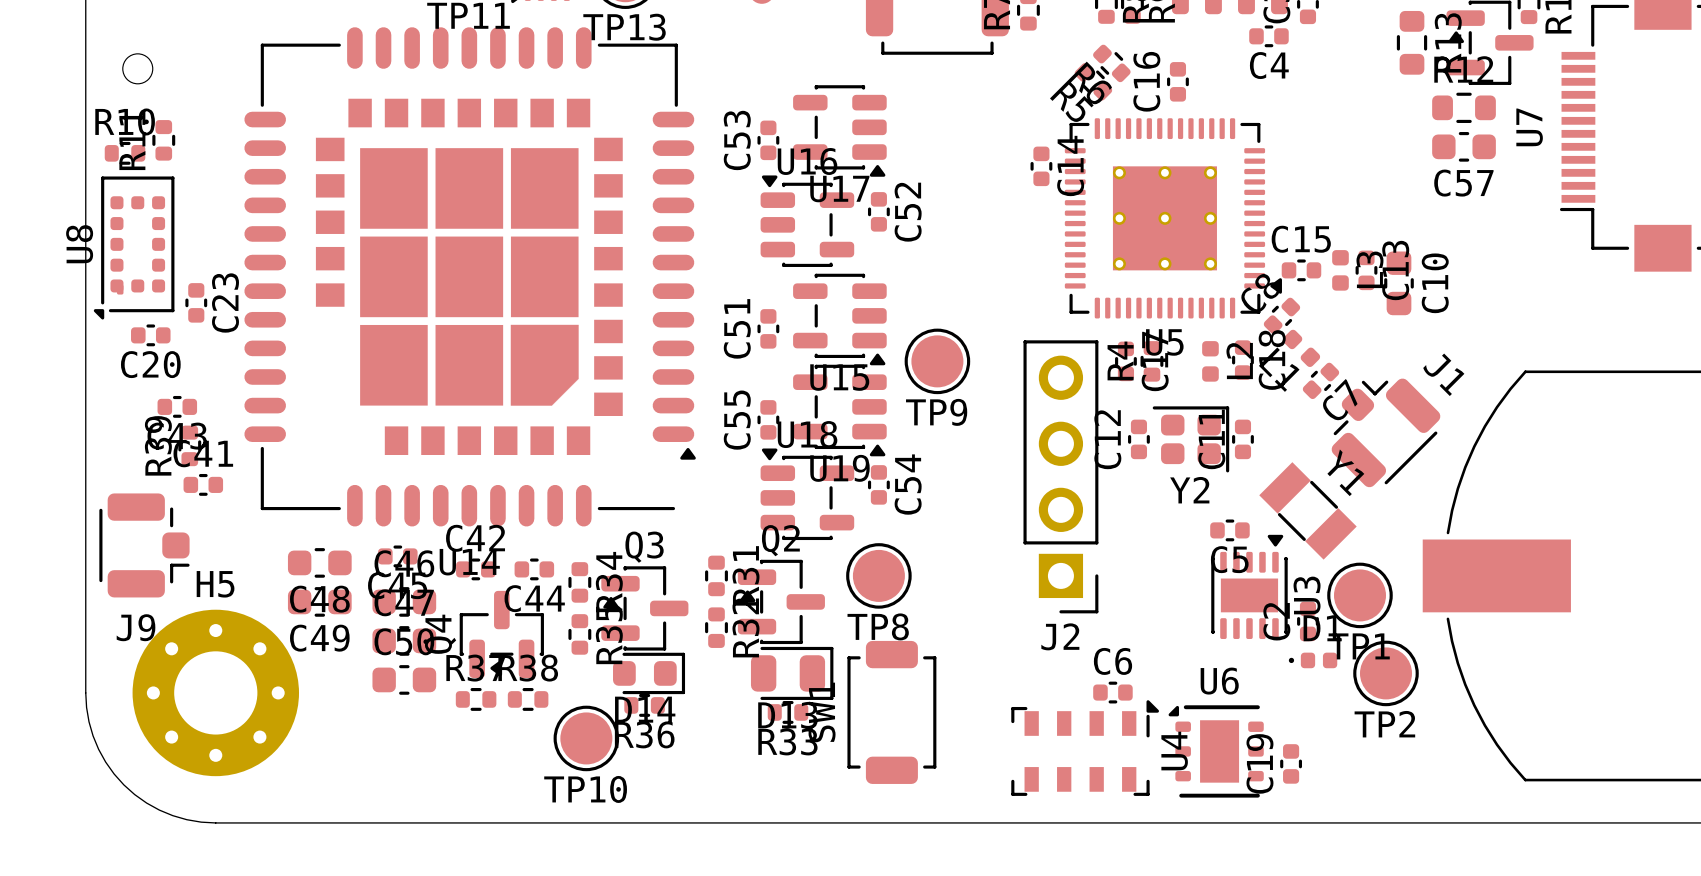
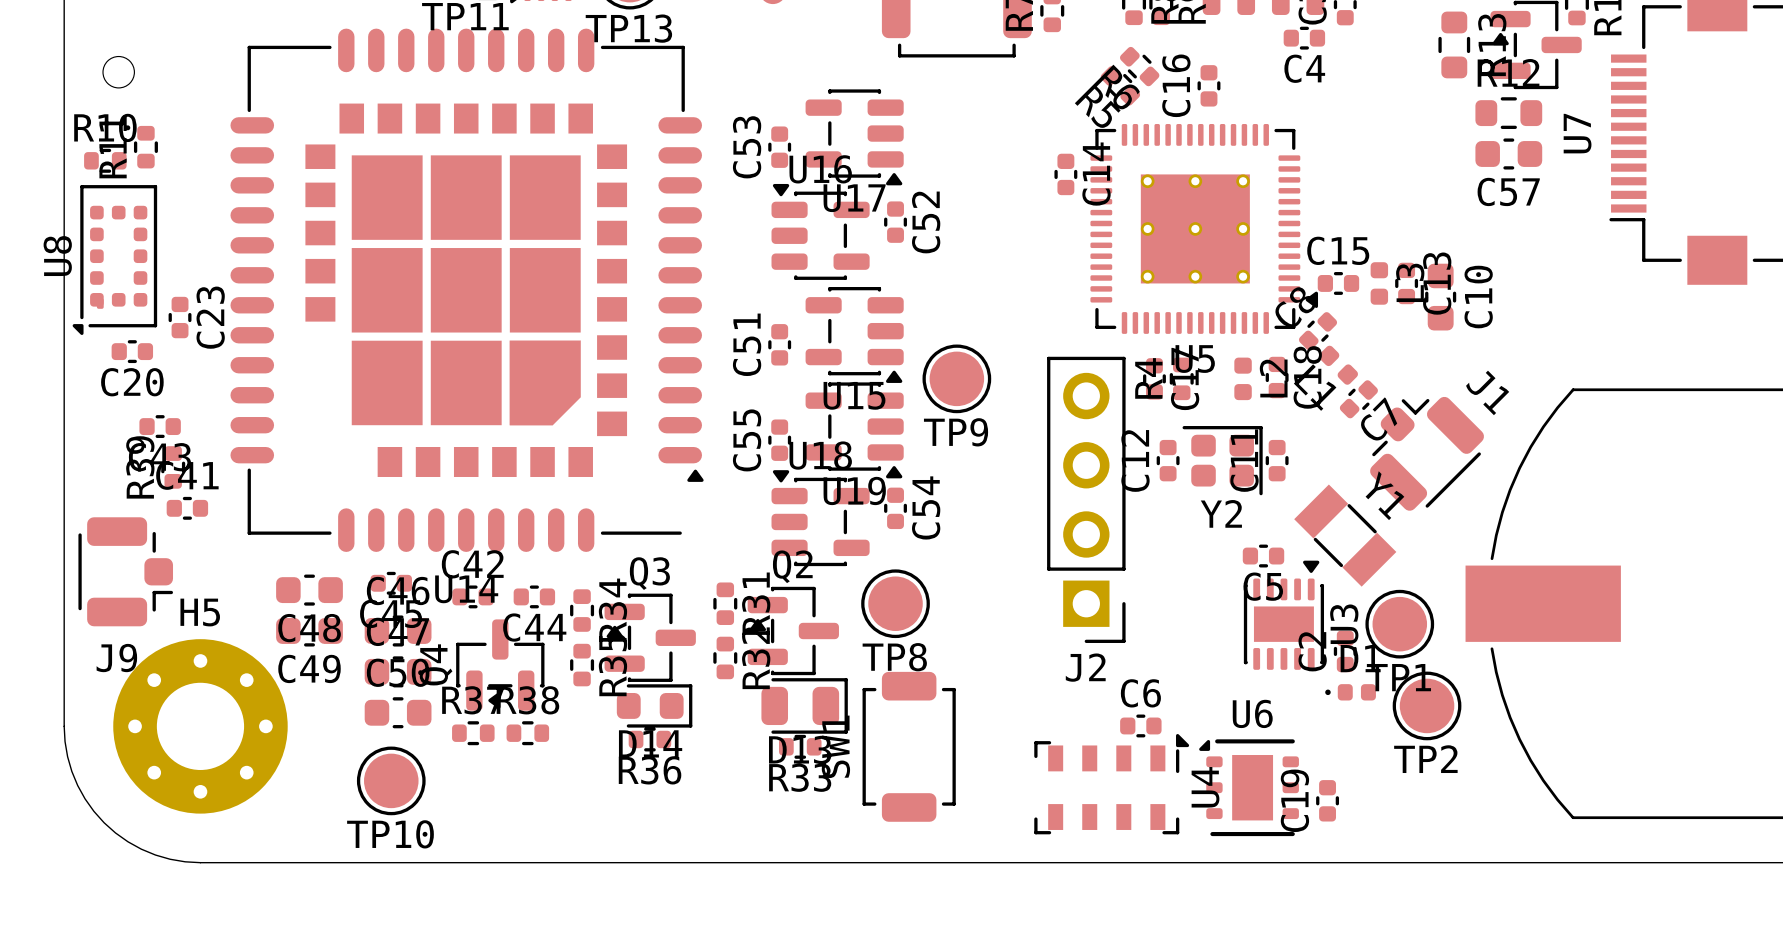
TP10 position: (586, 738) -> (391, 780)

